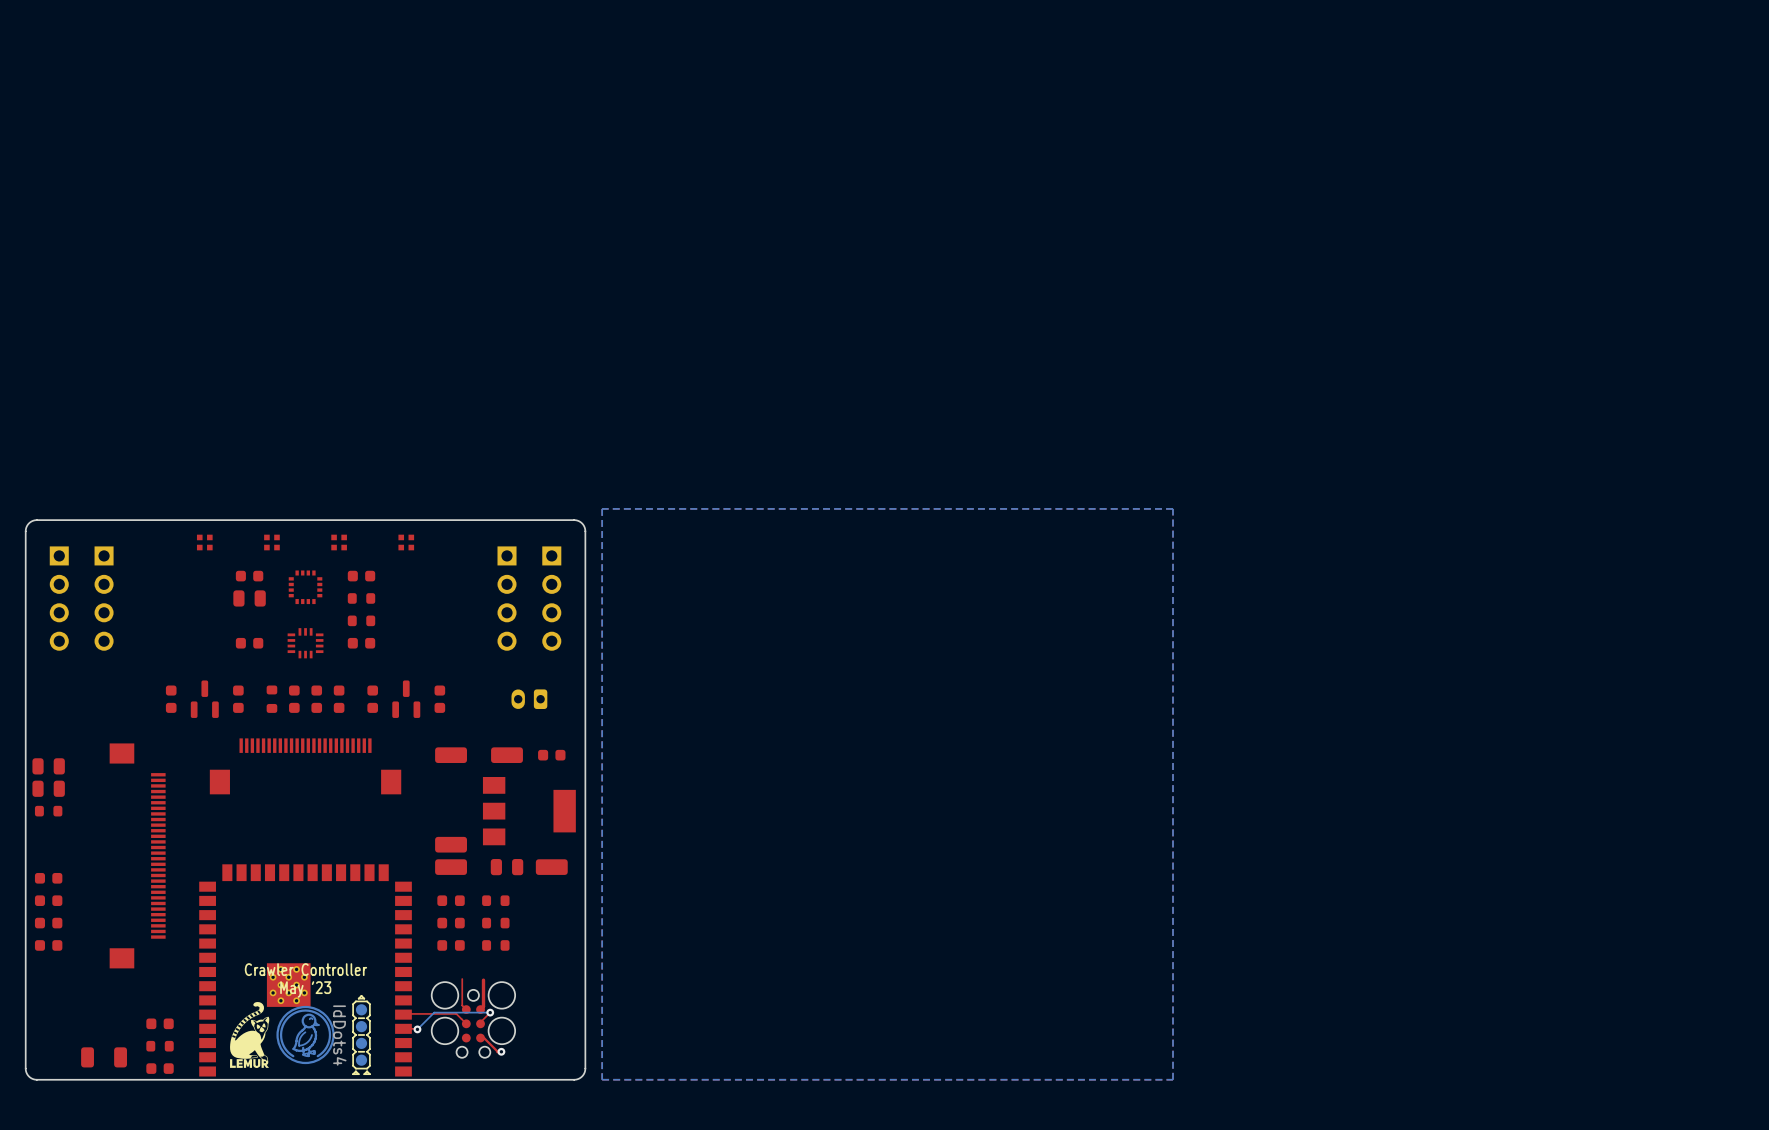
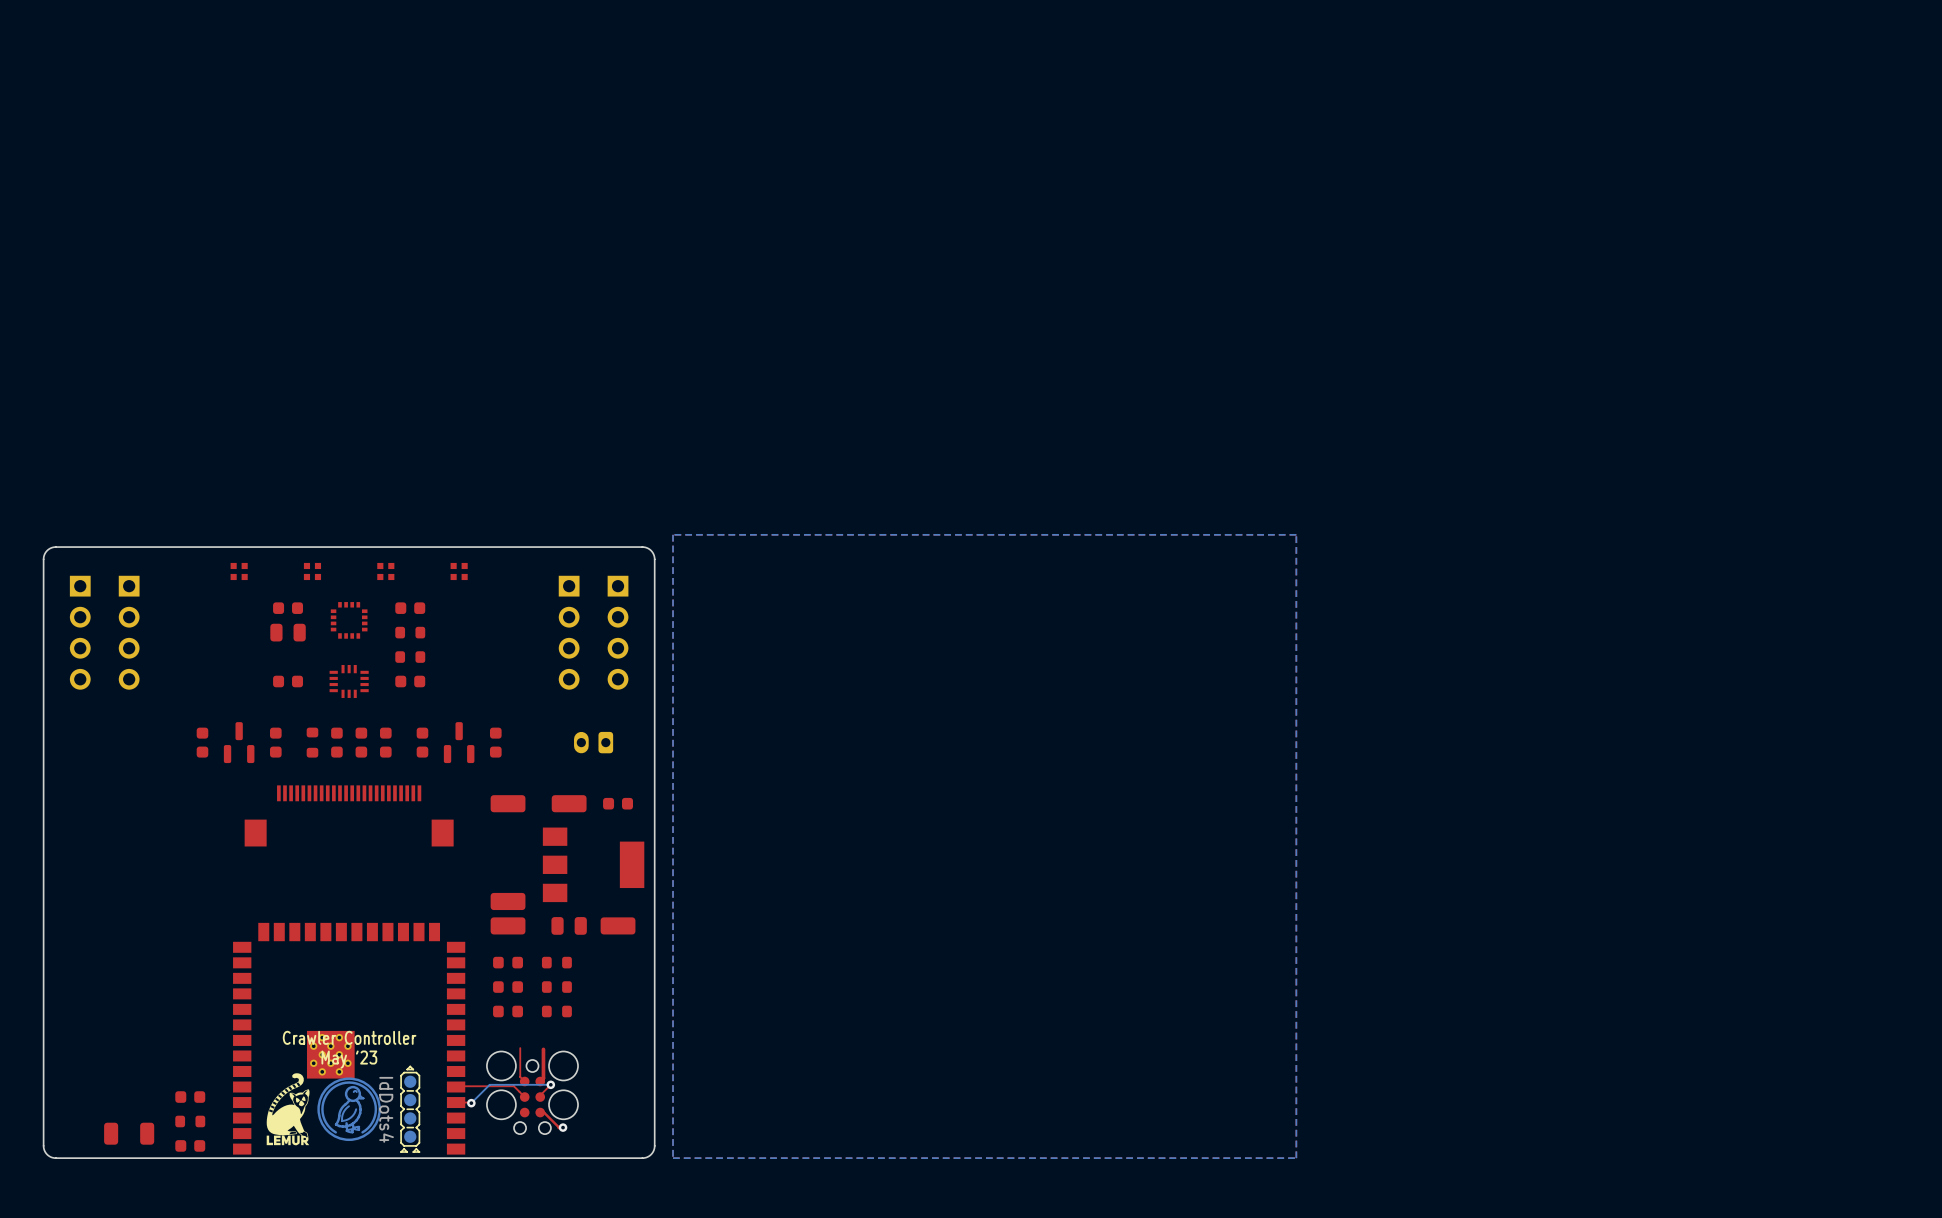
part: (48, 766) -> none
part: (48, 788) -> none
part: (48, 811) -> none
part: (137, 855) -> none
part: (48, 878) -> none
part: (48, 900) -> none
part: (48, 923) -> none
part: (48, 945) -> none

